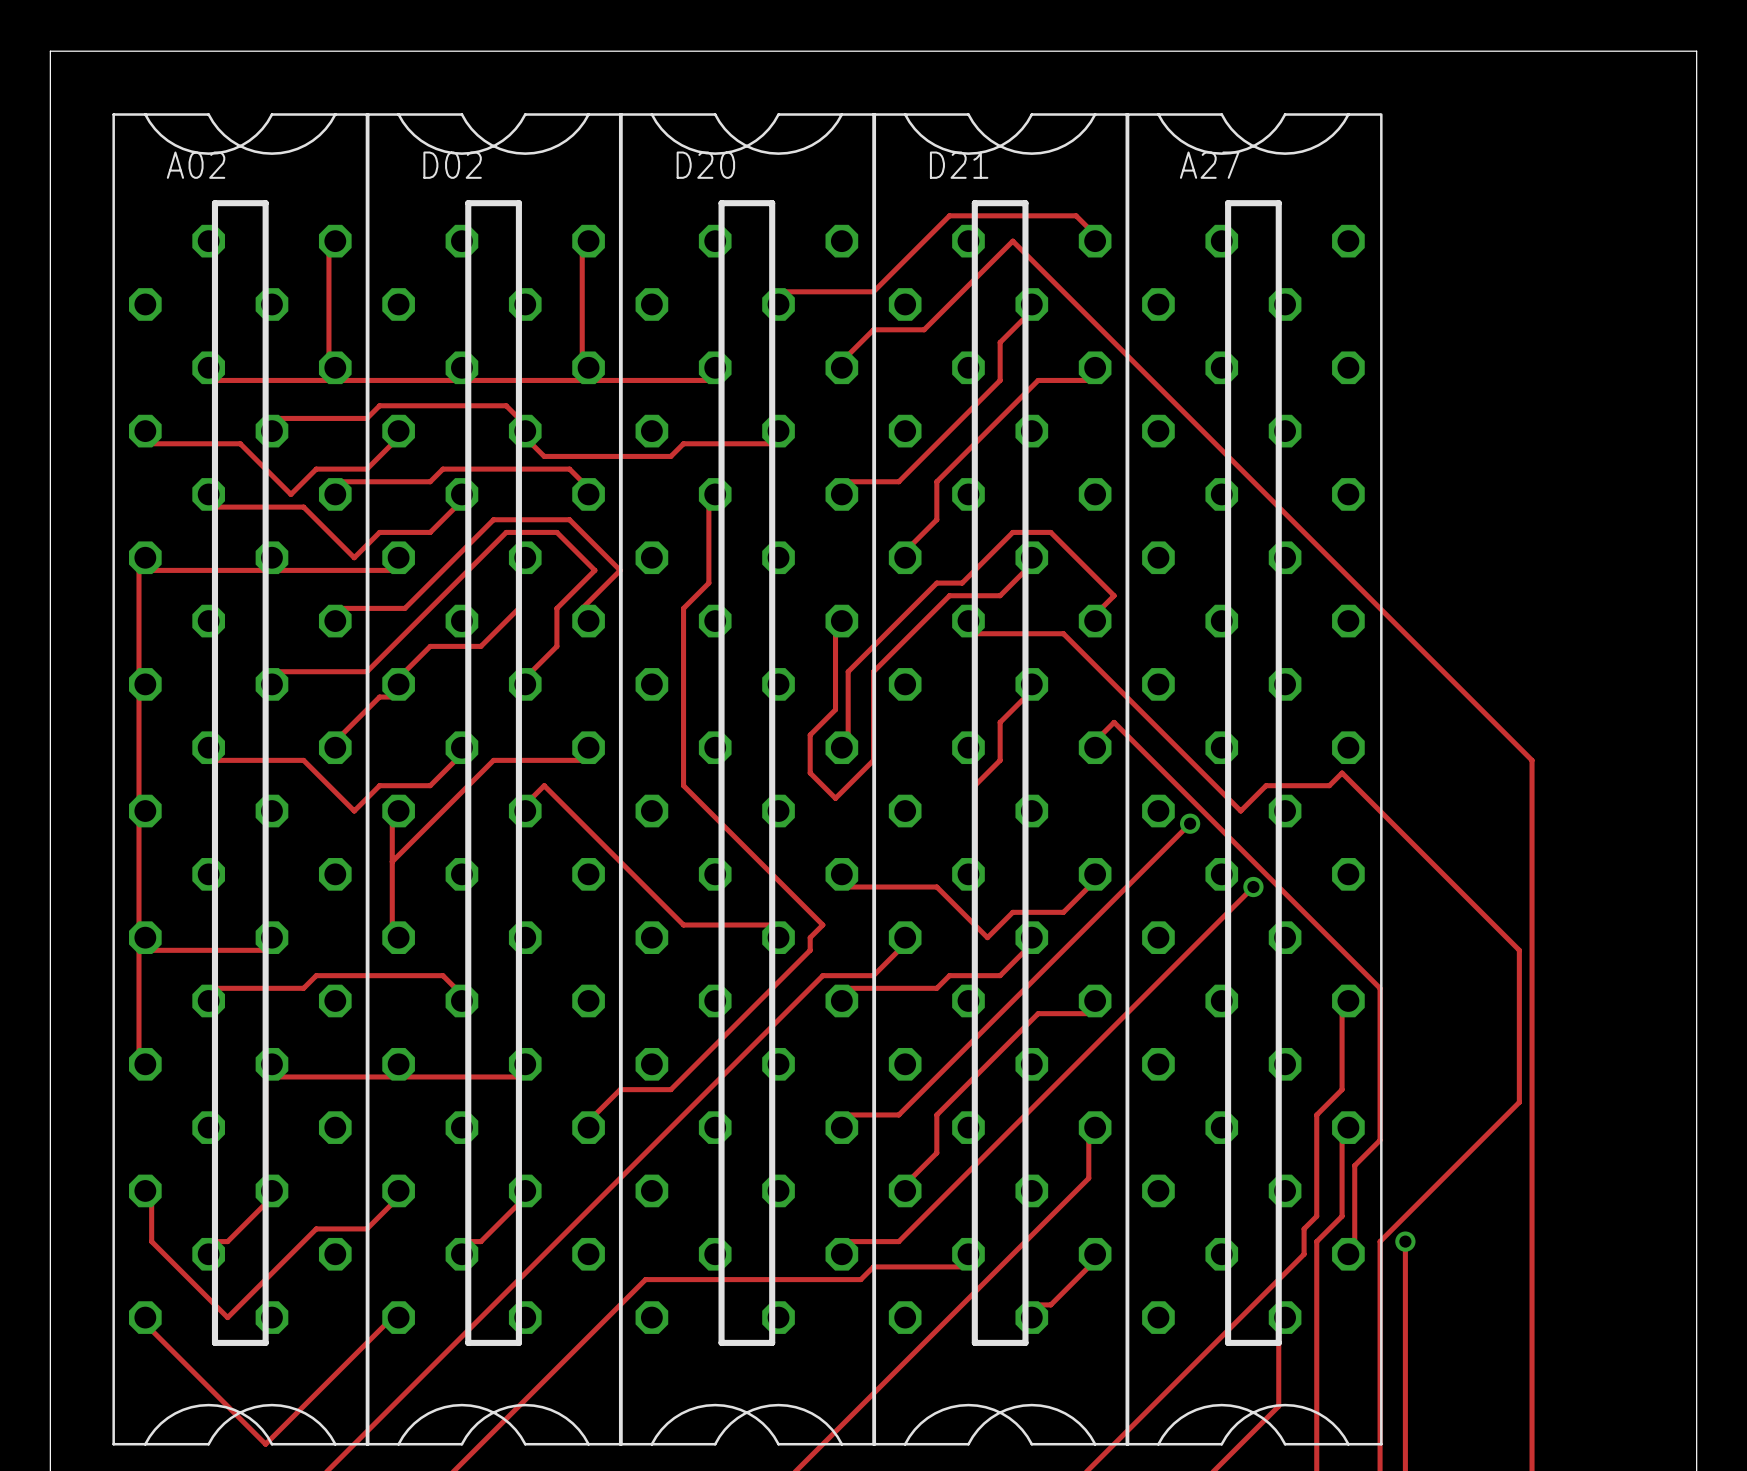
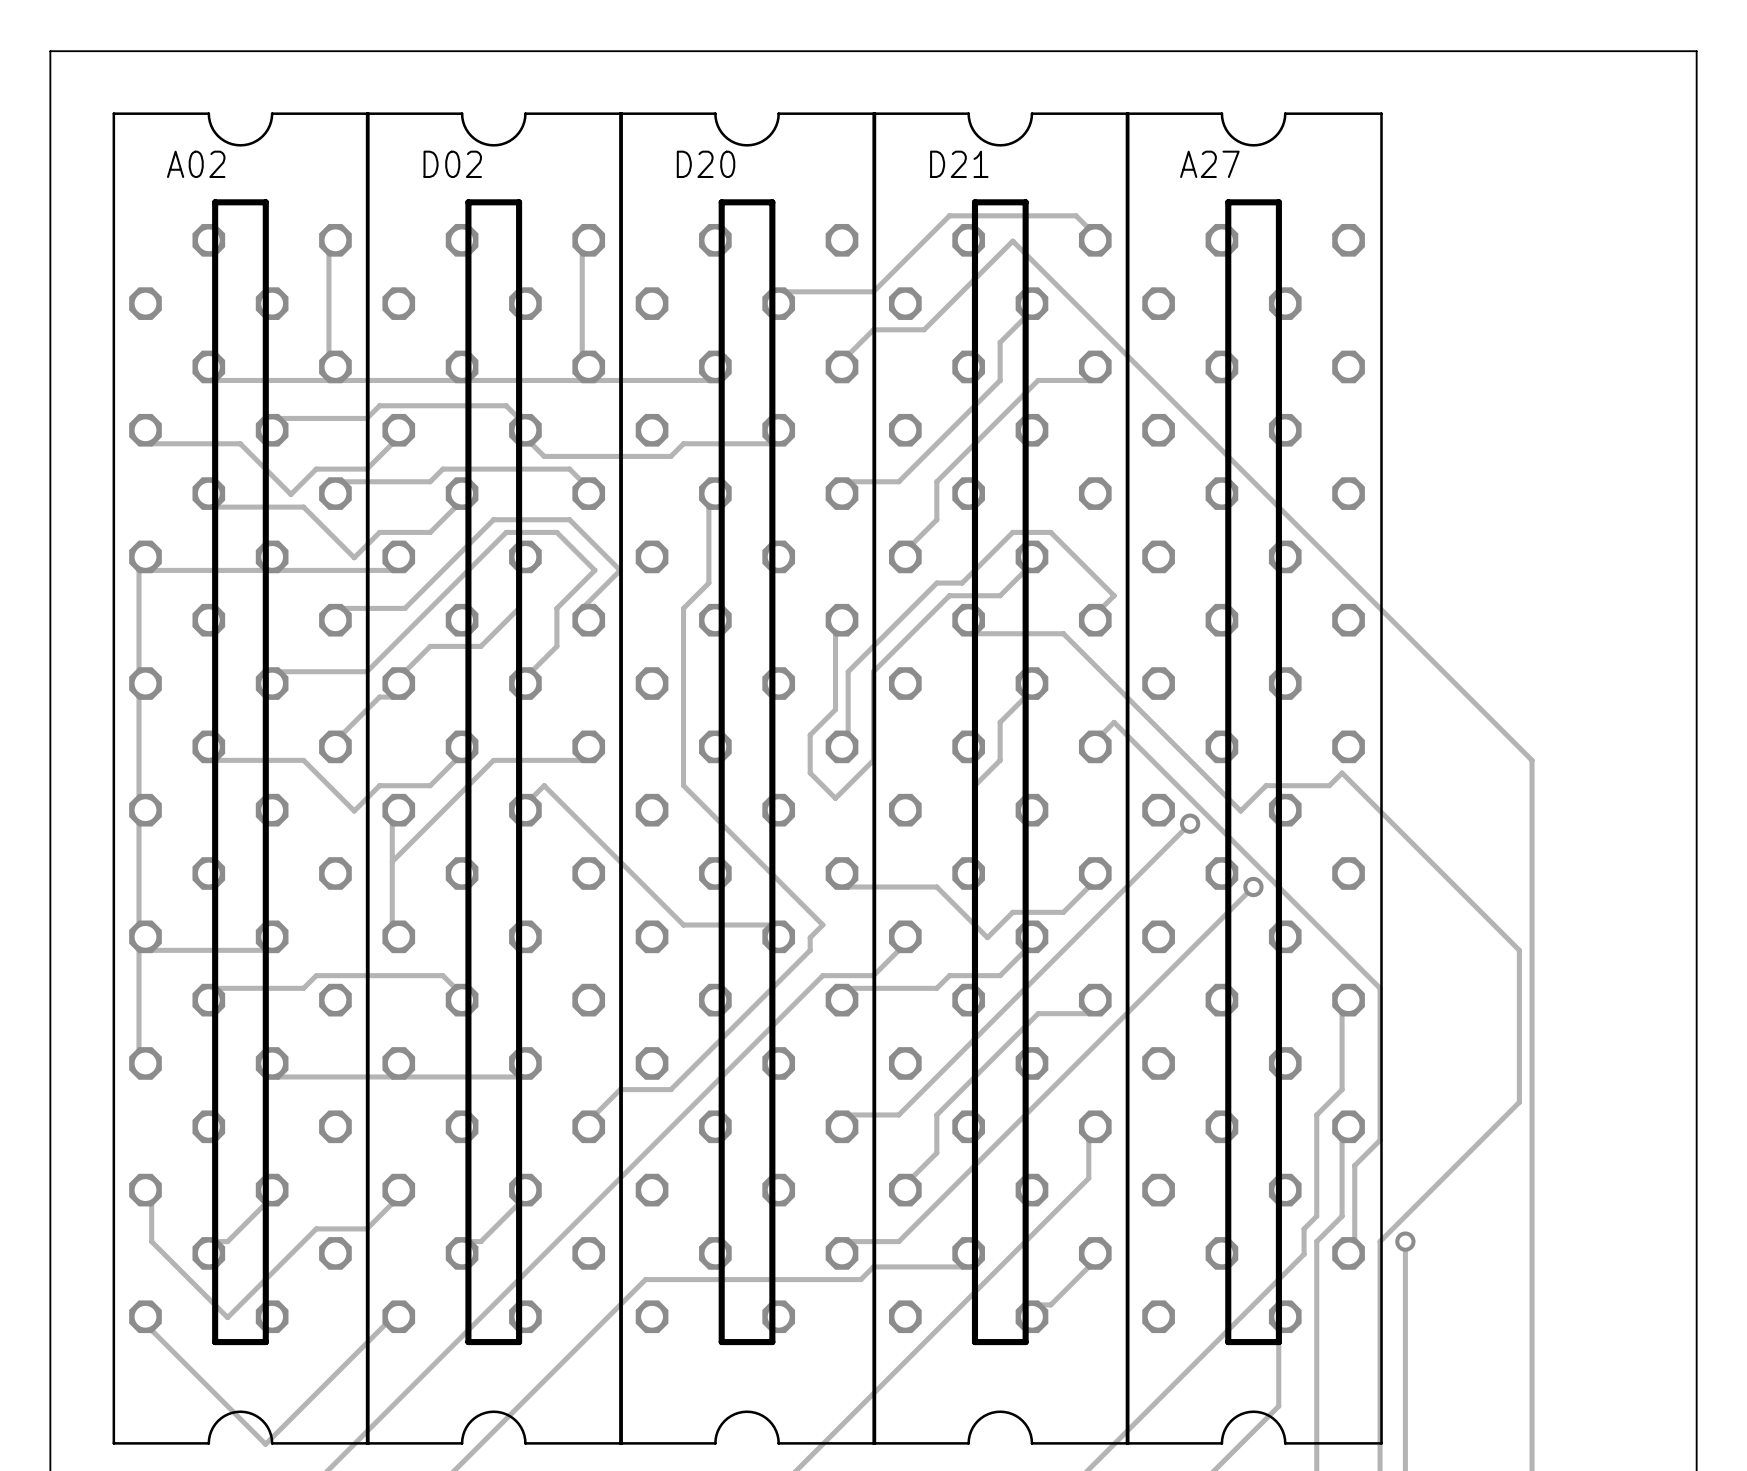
A02 footprint: [112, 113, 370, 1446] -> [112, 112, 370, 1445]
D02 footprint: [365, 113, 623, 1446] -> [365, 112, 623, 1445]
D20 footprint: [618, 113, 877, 1446] -> [619, 112, 877, 1445]
D21 footprint: [872, 113, 1130, 1446] -> [872, 112, 1130, 1445]
A27 footprint: [1125, 113, 1383, 1446] -> [1125, 112, 1383, 1445]

